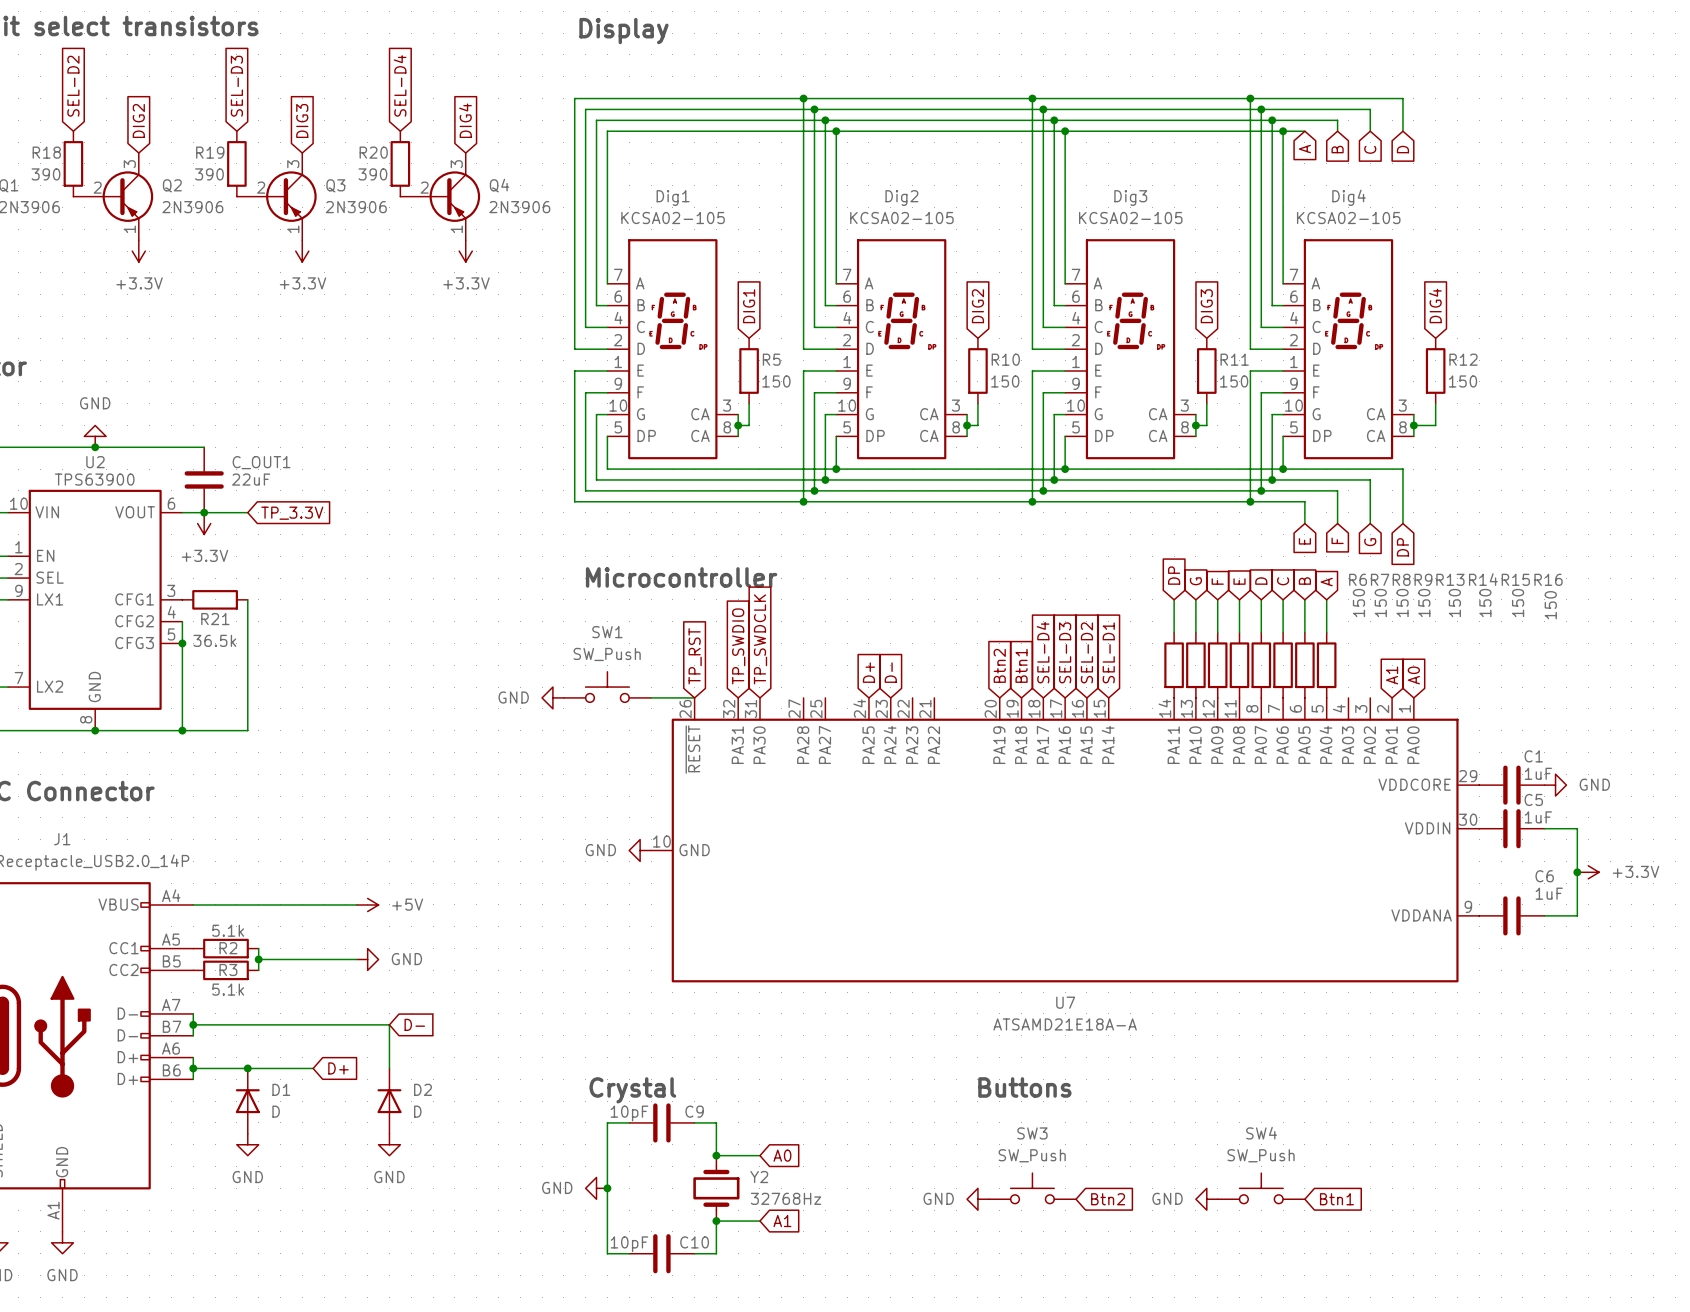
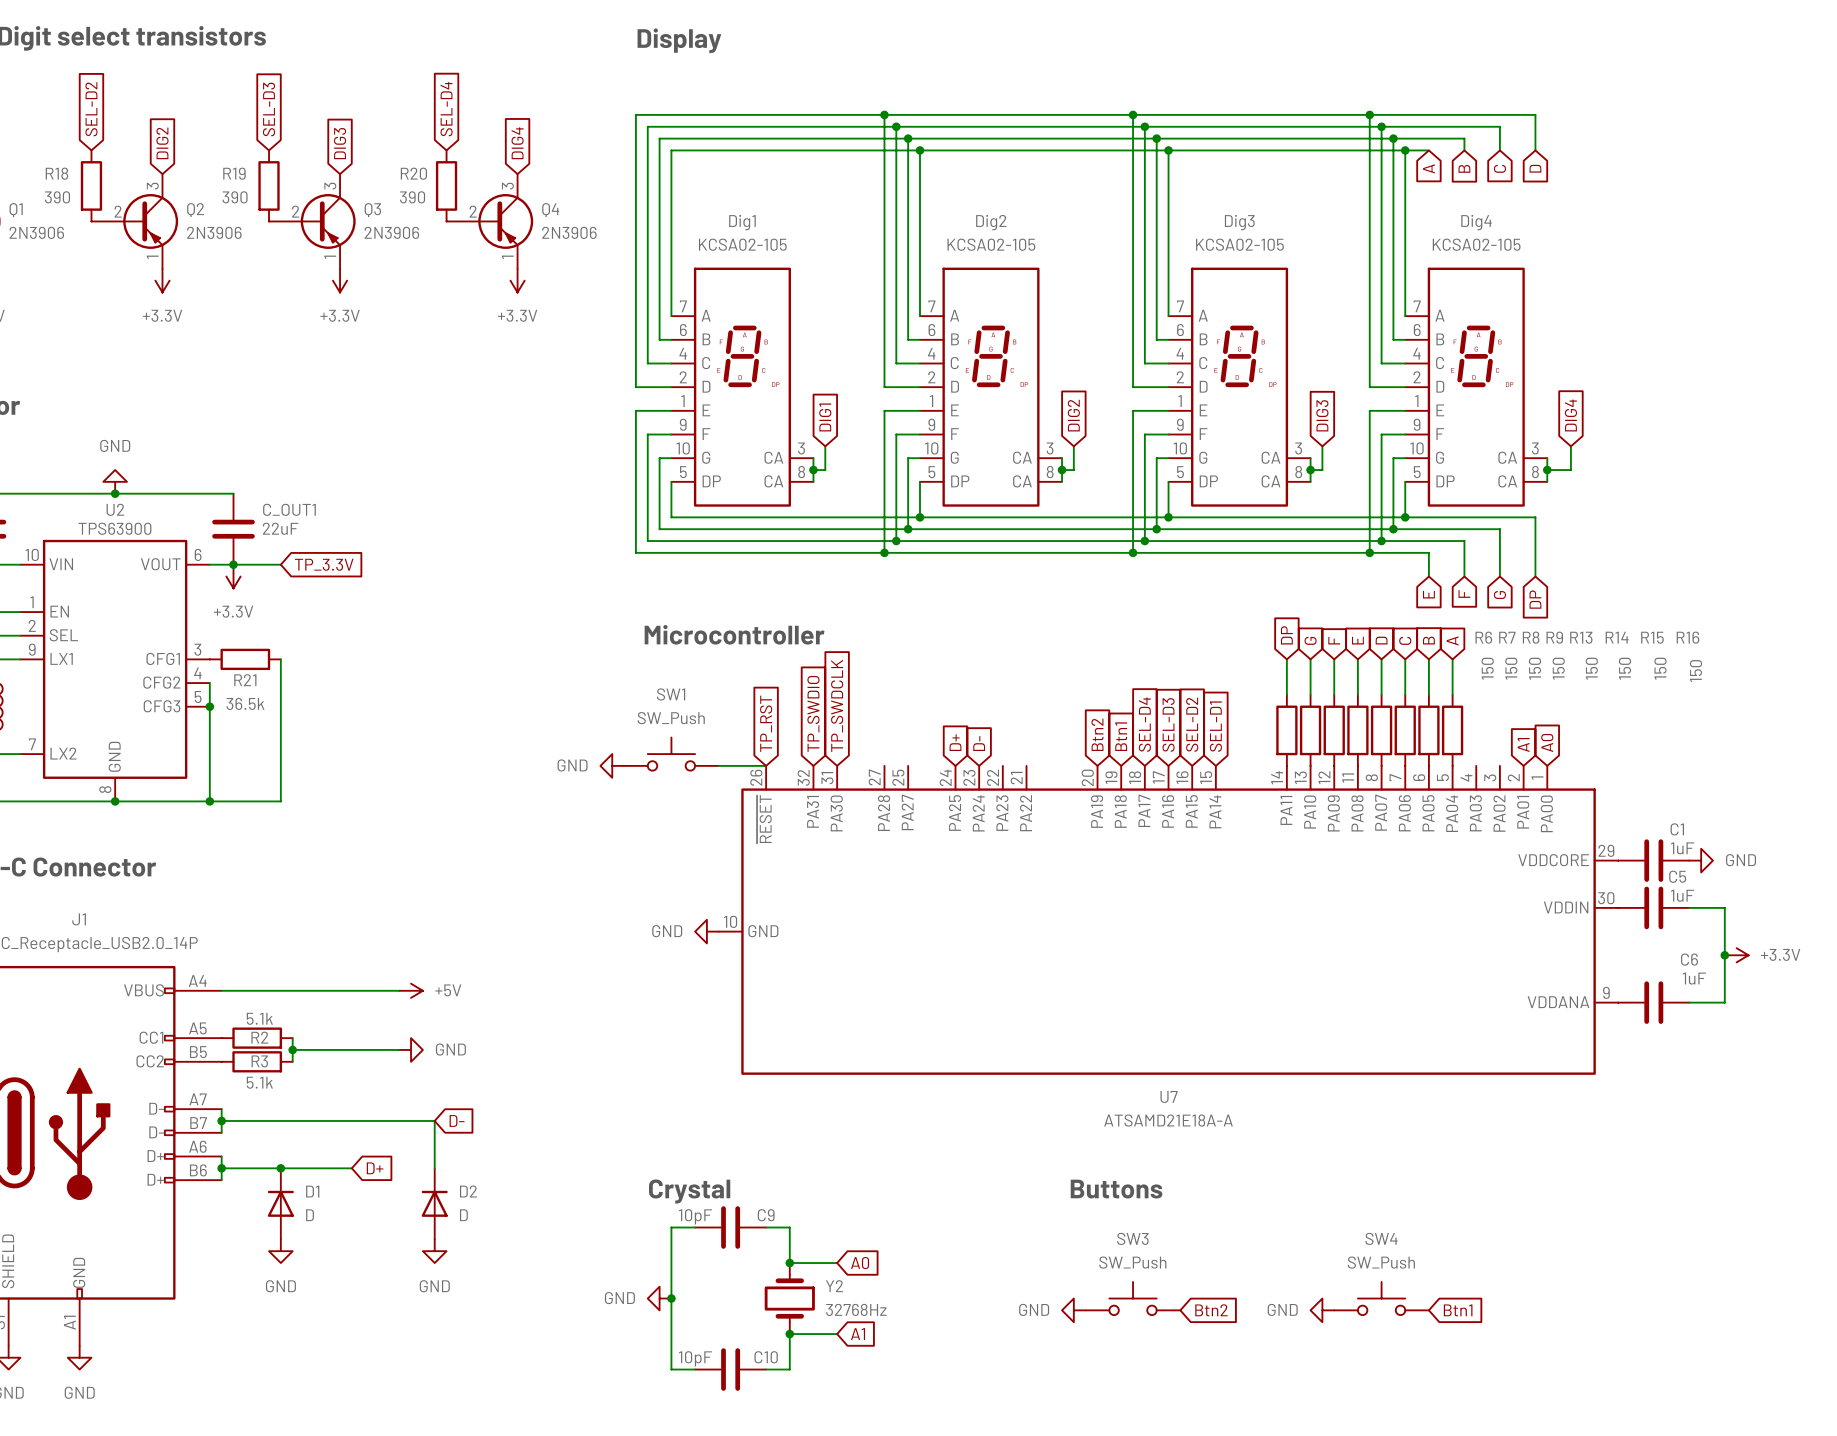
global label position: DIG4 (1435, 305) -> DIG4 (1570, 415)
global label position: DIG1 (749, 306) -> DIG1 (825, 417)
global label position: DIG2 (977, 306) -> DIG2 (1073, 415)
global label position: DIG3 (1206, 306) -> DIG3 (1322, 415)
R5: 150 (749, 370) -> none
R10: 150 (977, 370) -> none
R11: 150 (1206, 370) -> none
R12: 150 (1435, 370) -> none

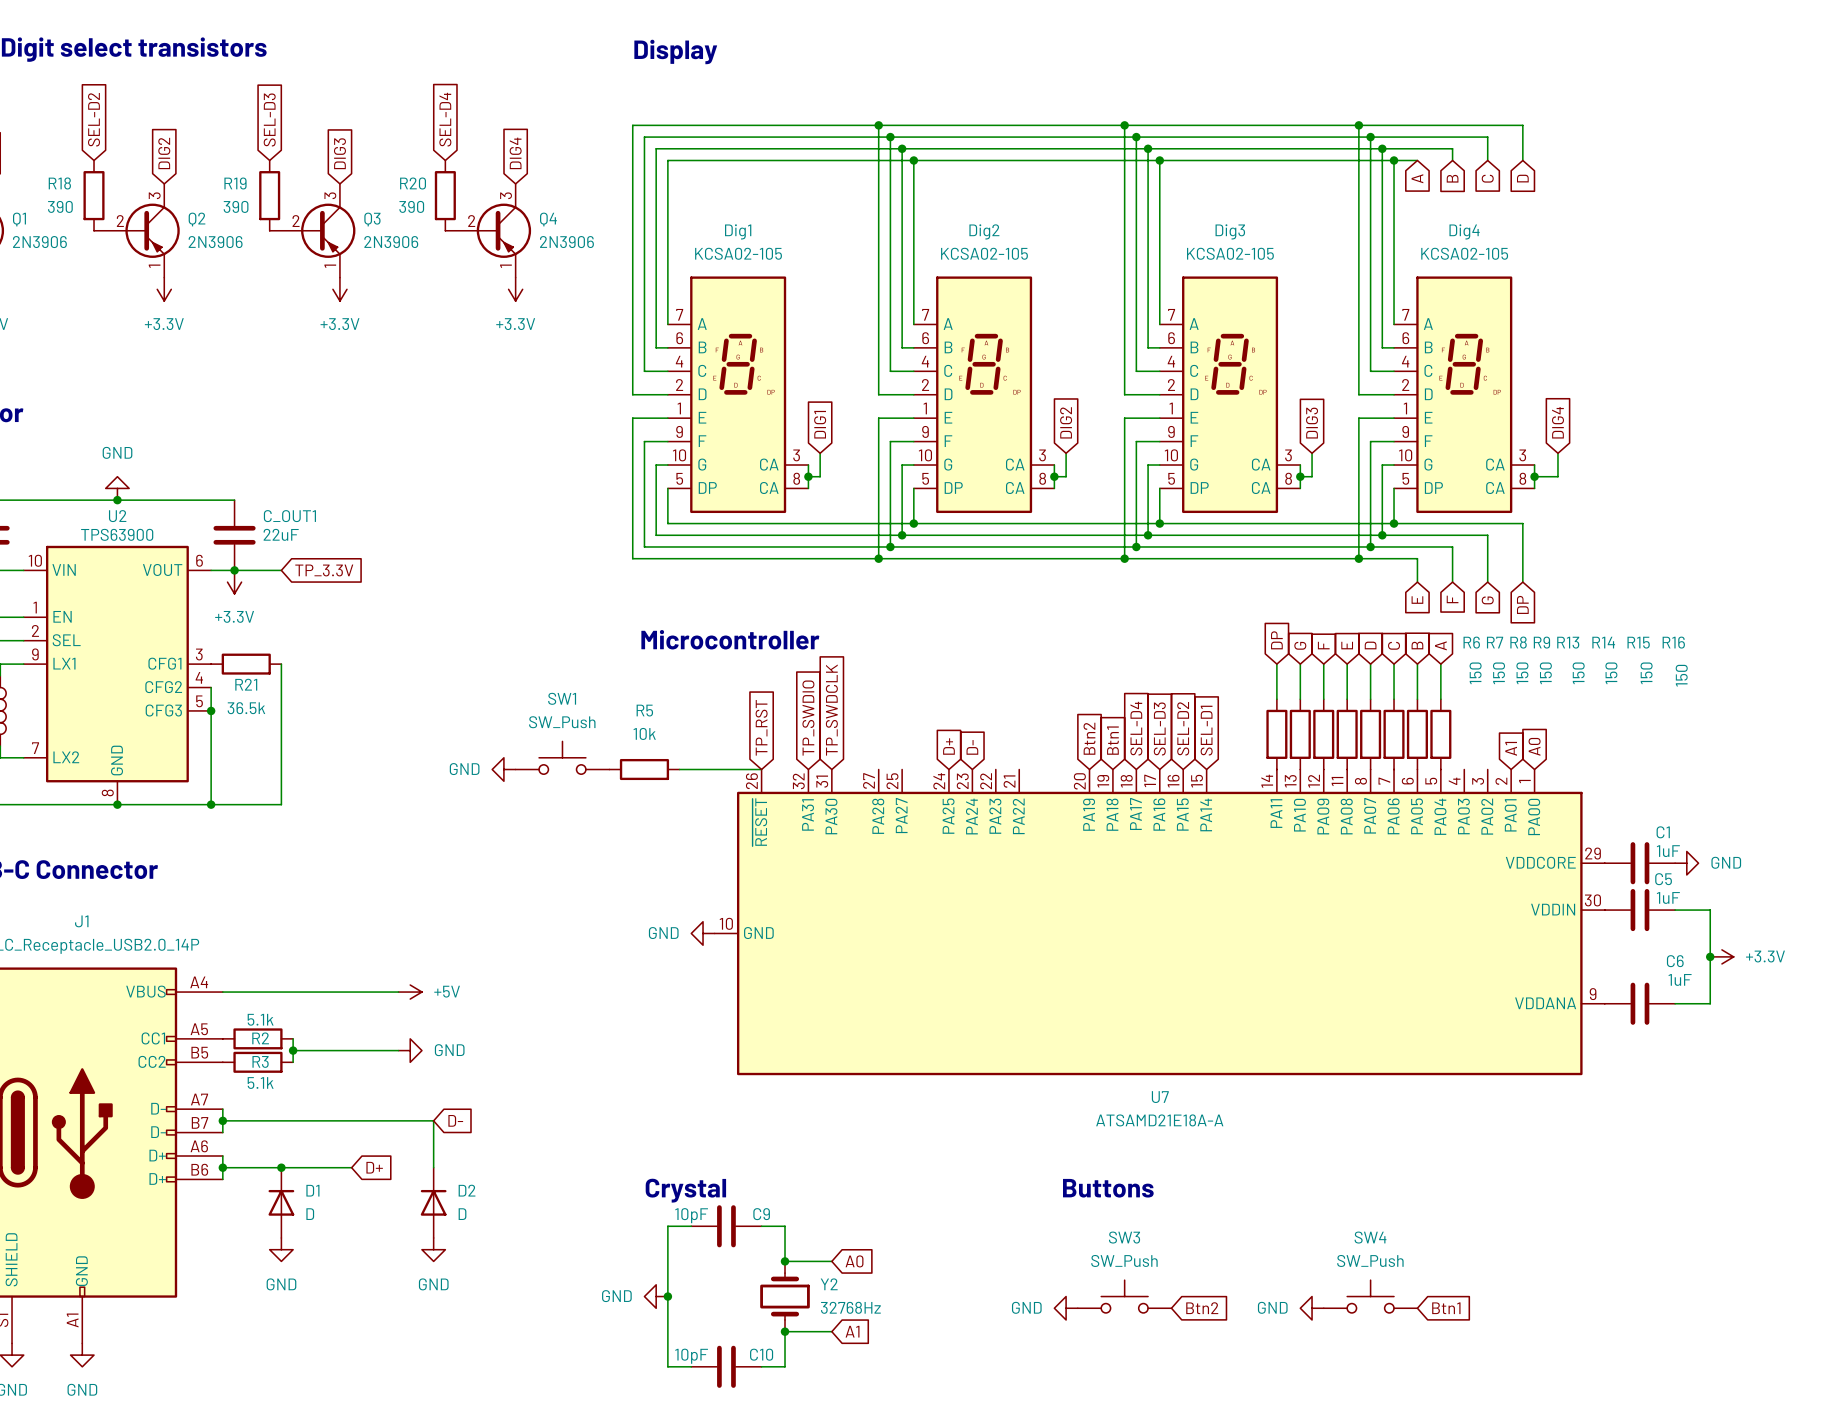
SW1 position: (671, 754) -> (562, 757)
power symbol position: GND (612, 765) -> GND (503, 769)
R5: none -> 10k (644, 769)

